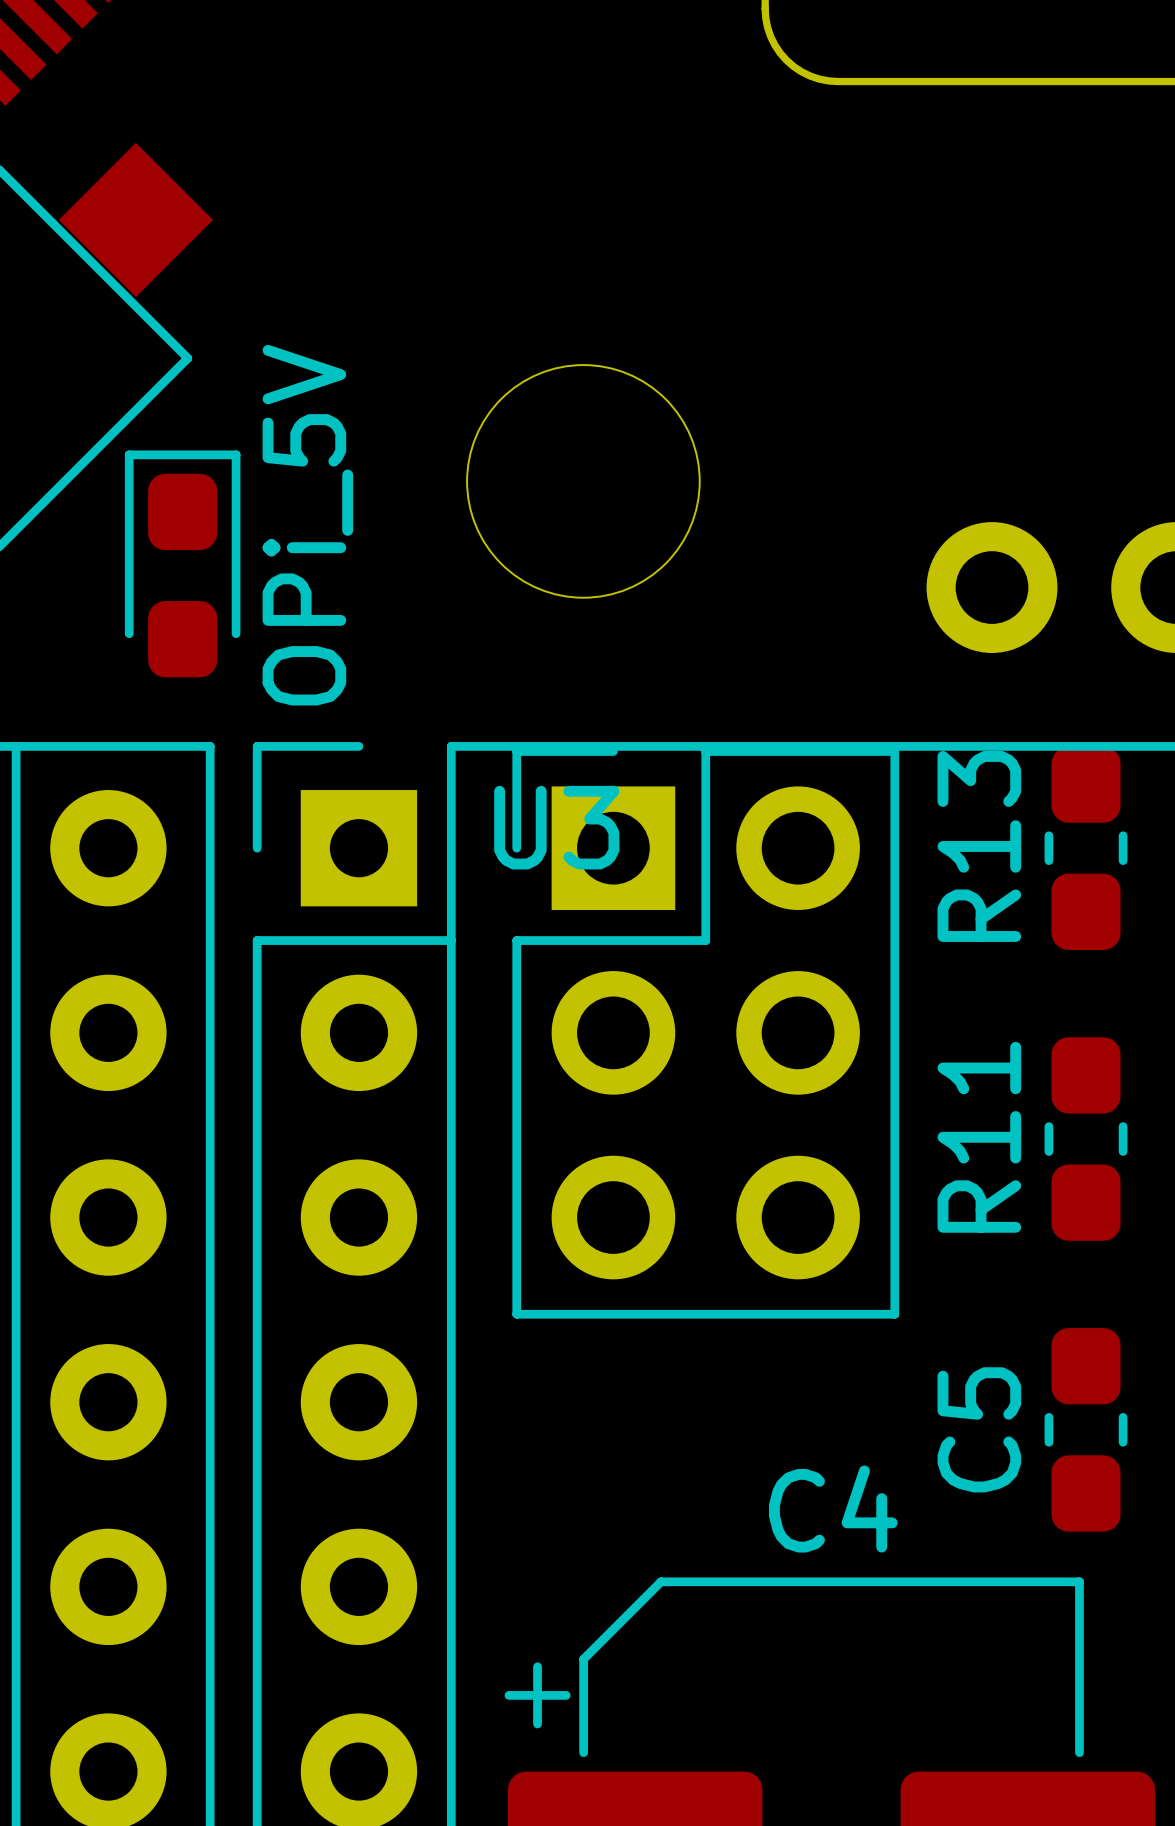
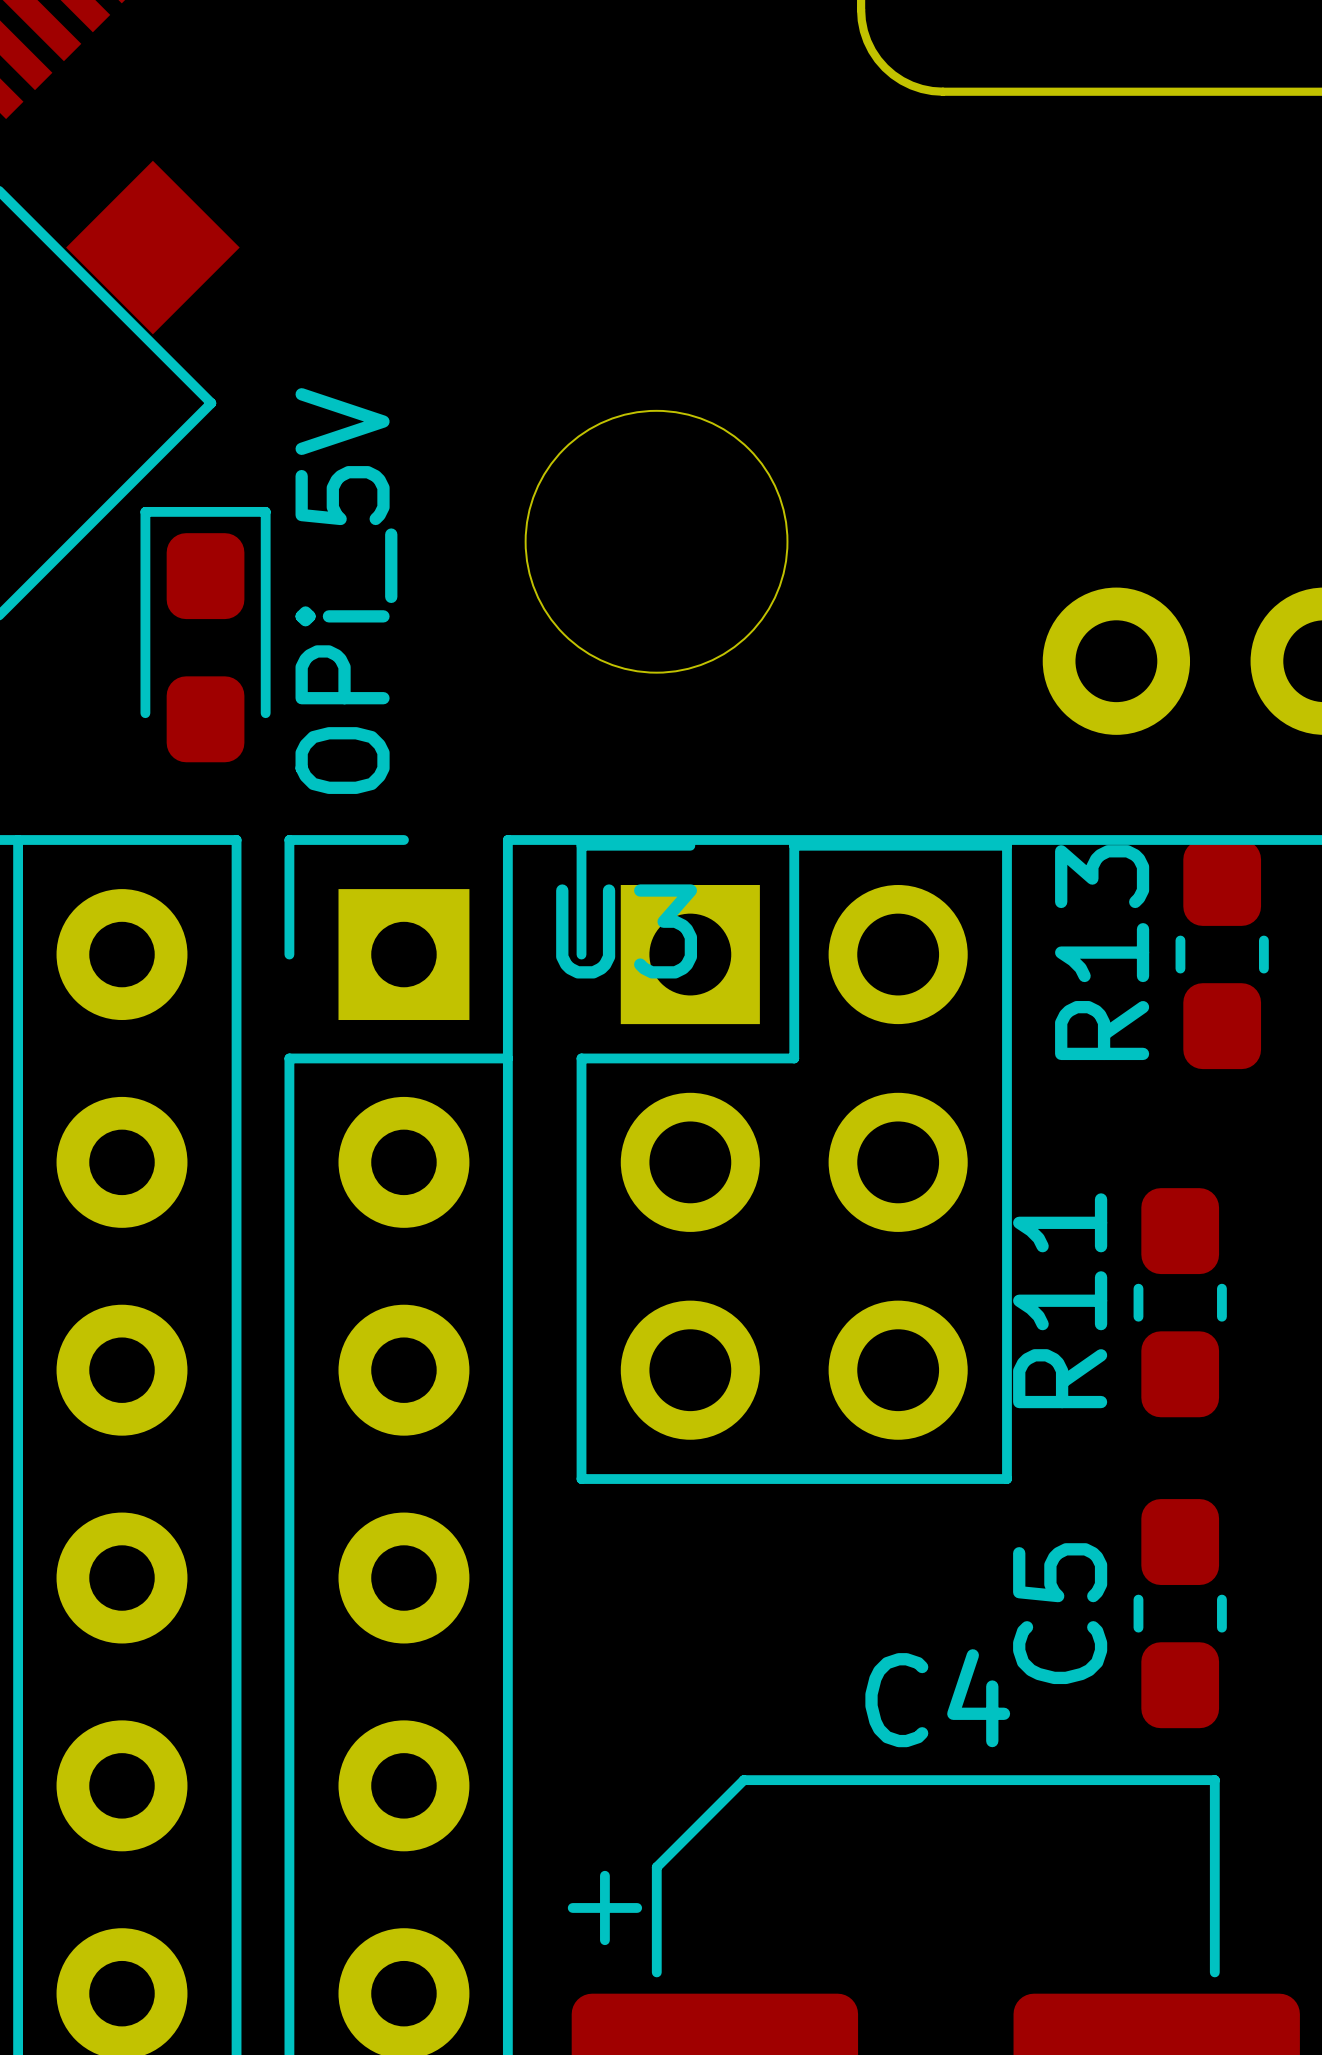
R11 position: (1086, 1139) -> (1180, 1302)
C5 position: (1086, 1429) -> (1180, 1613)

